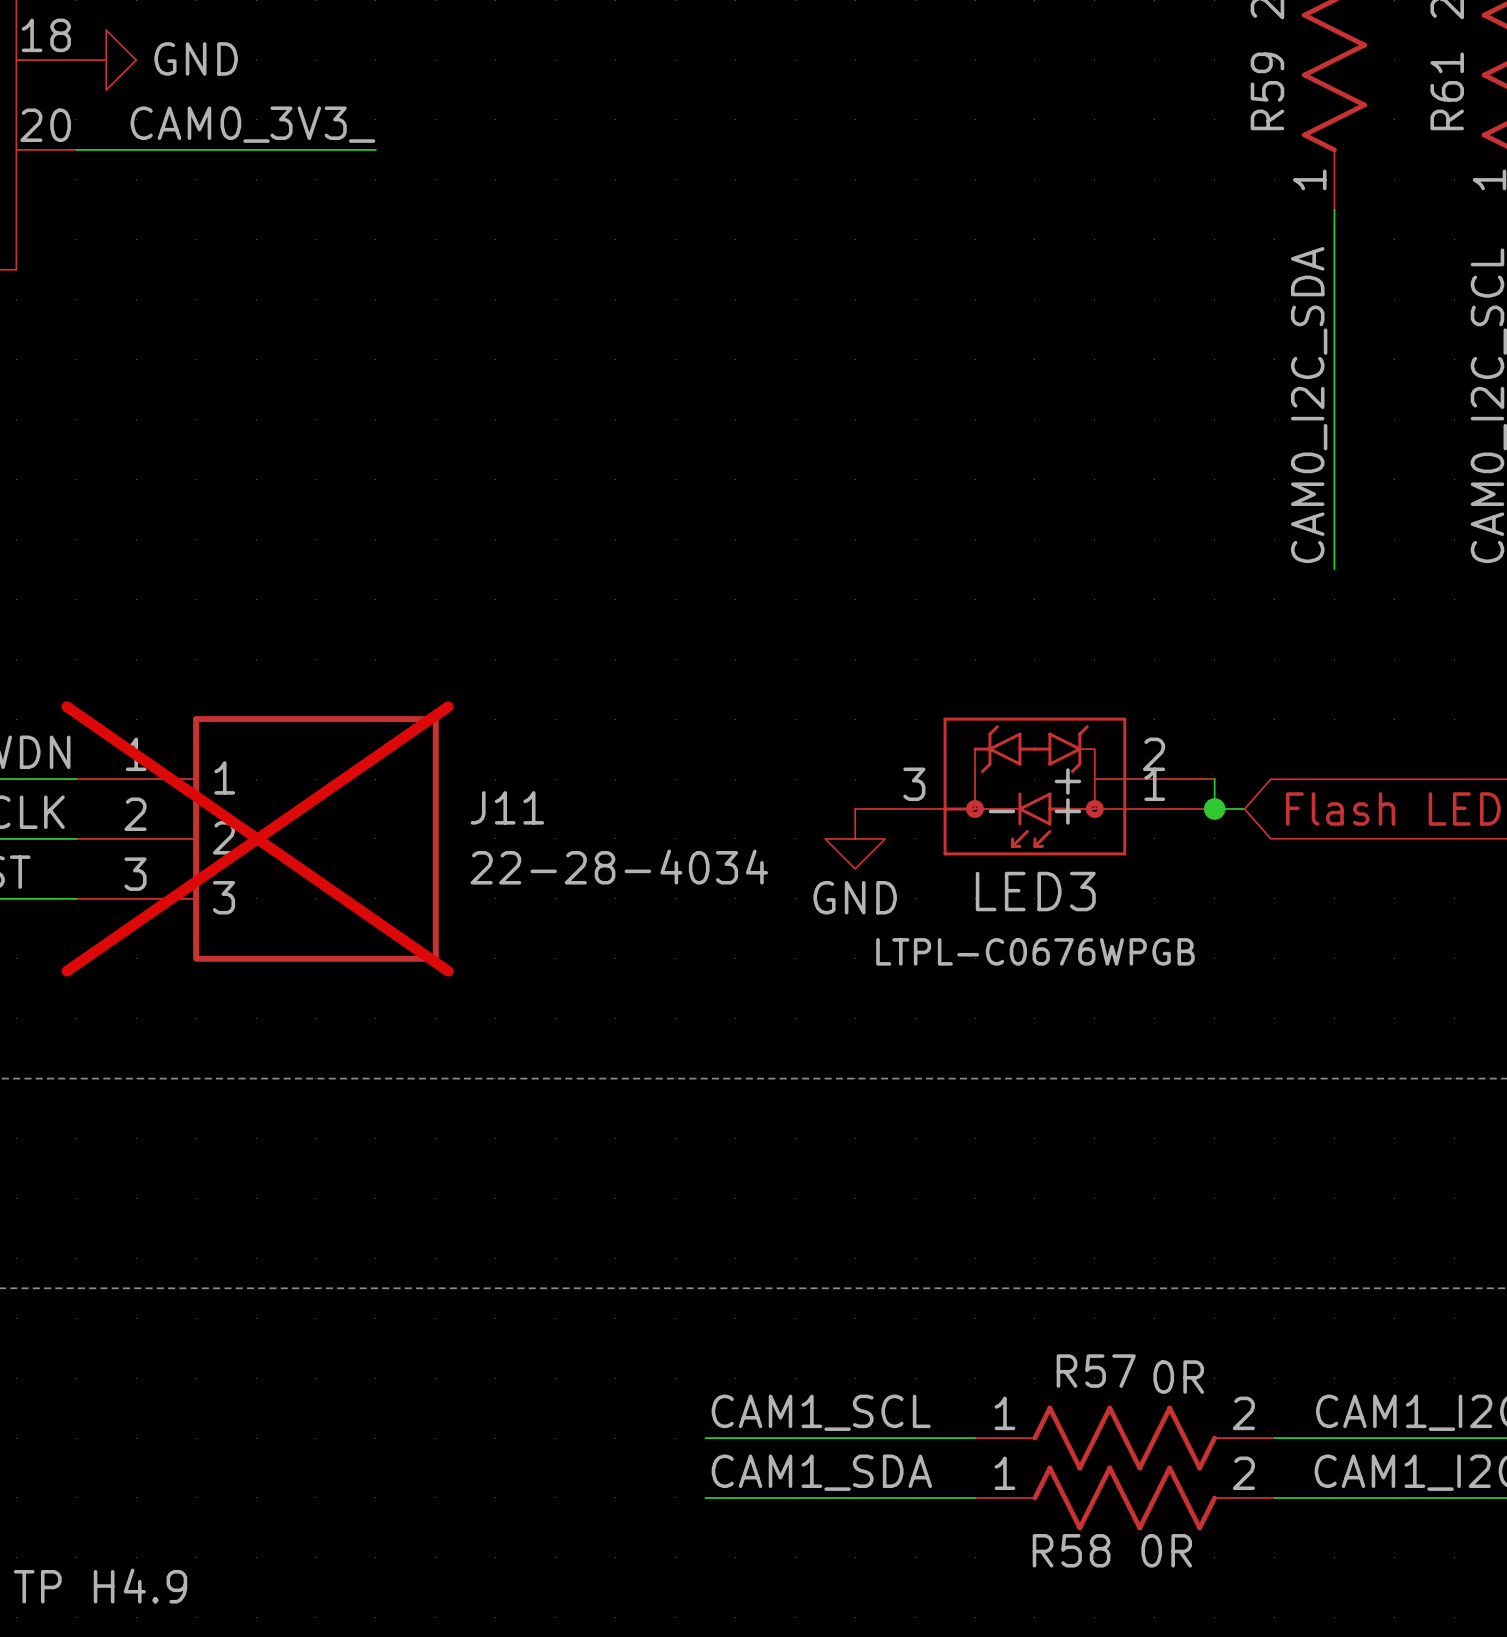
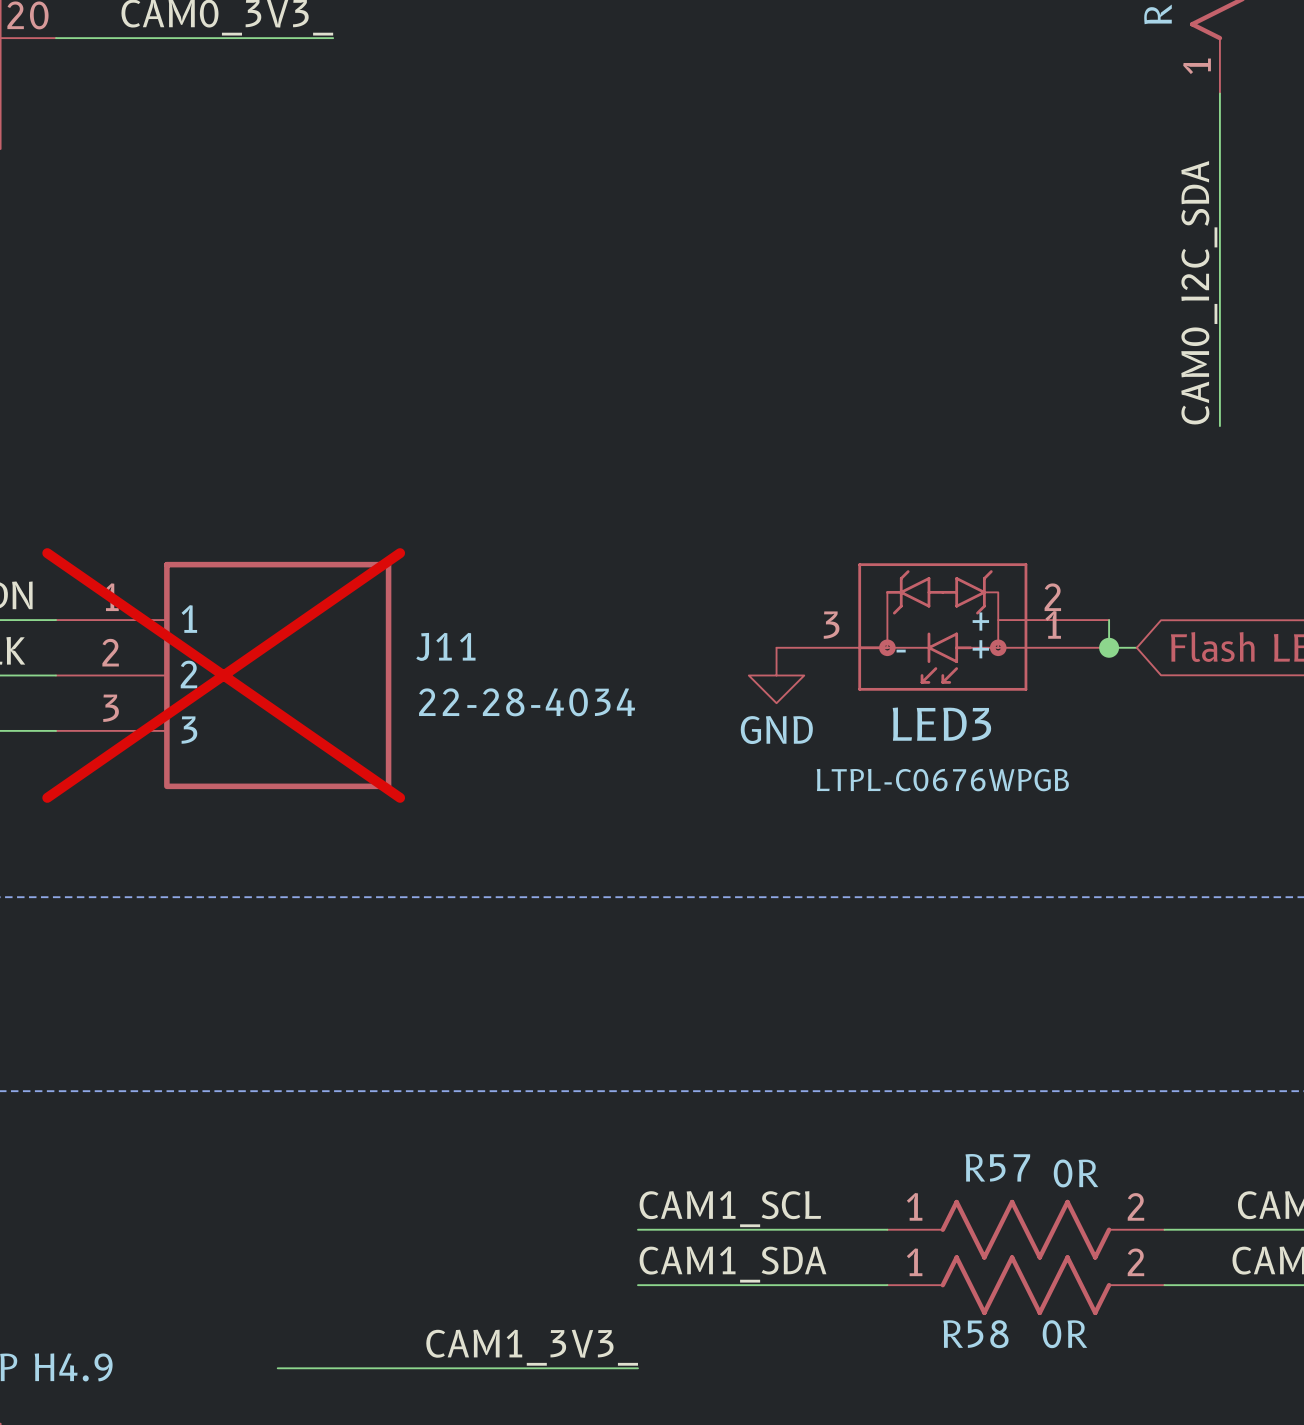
label: none -> CAM1_3V3_ (532, 1347)
wire: none -> (277, 1368) (637, 1368)

